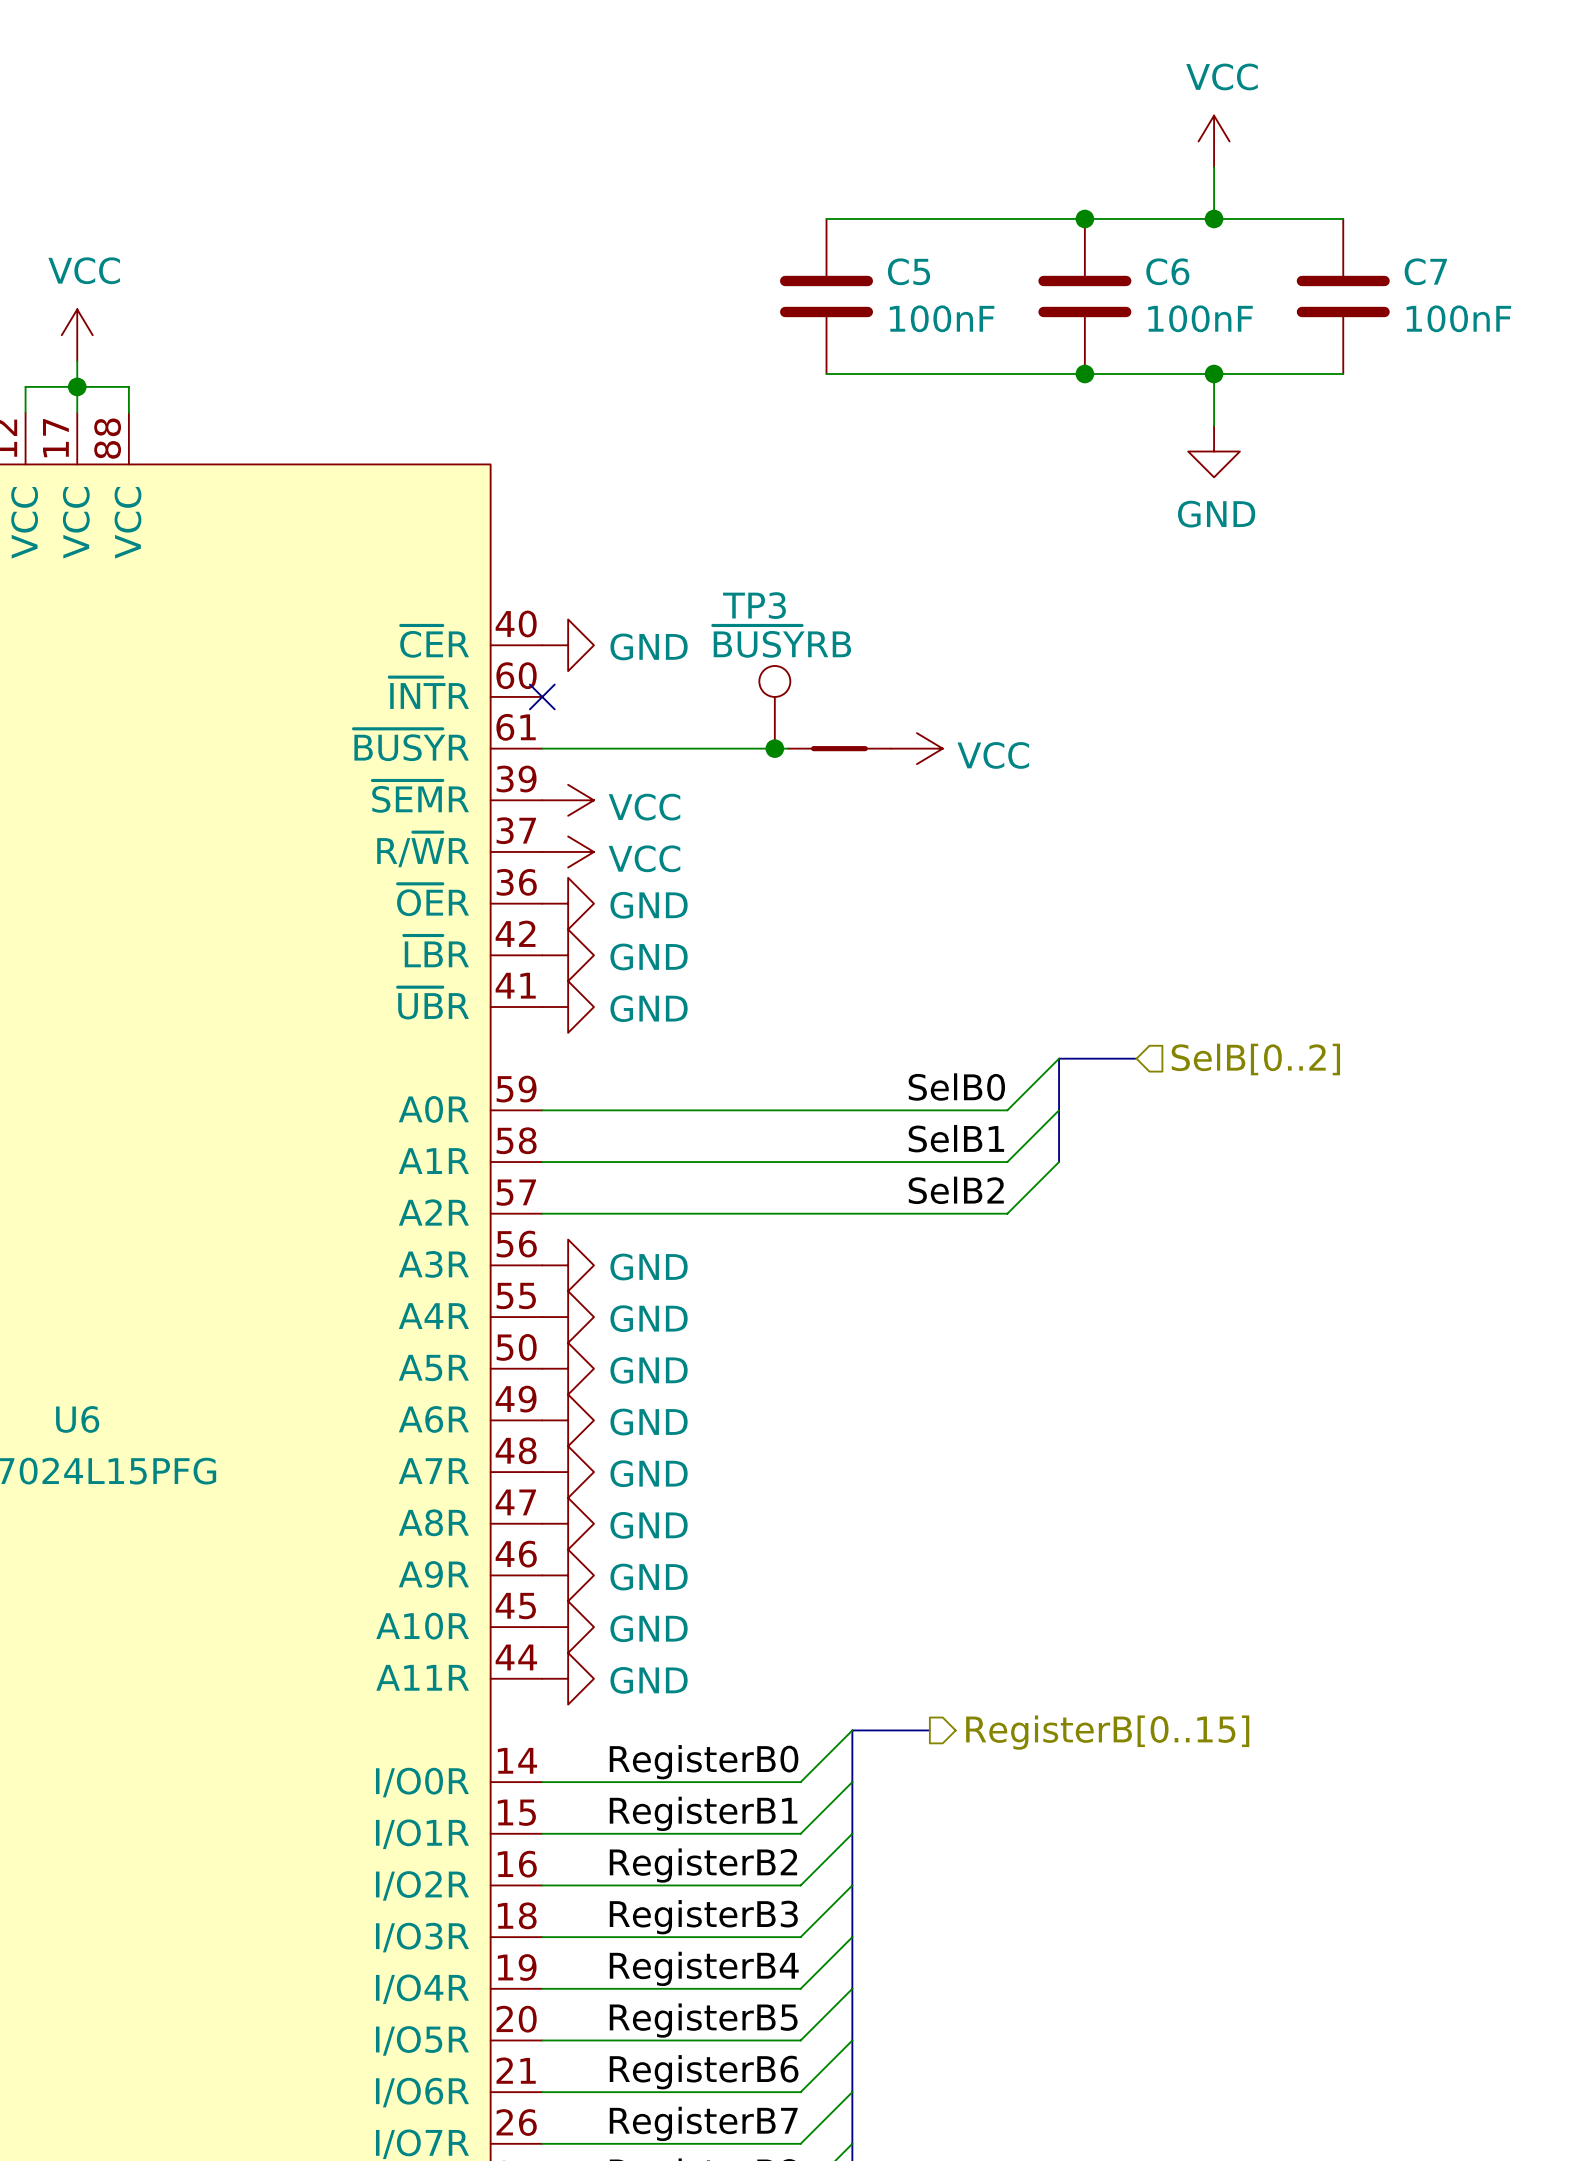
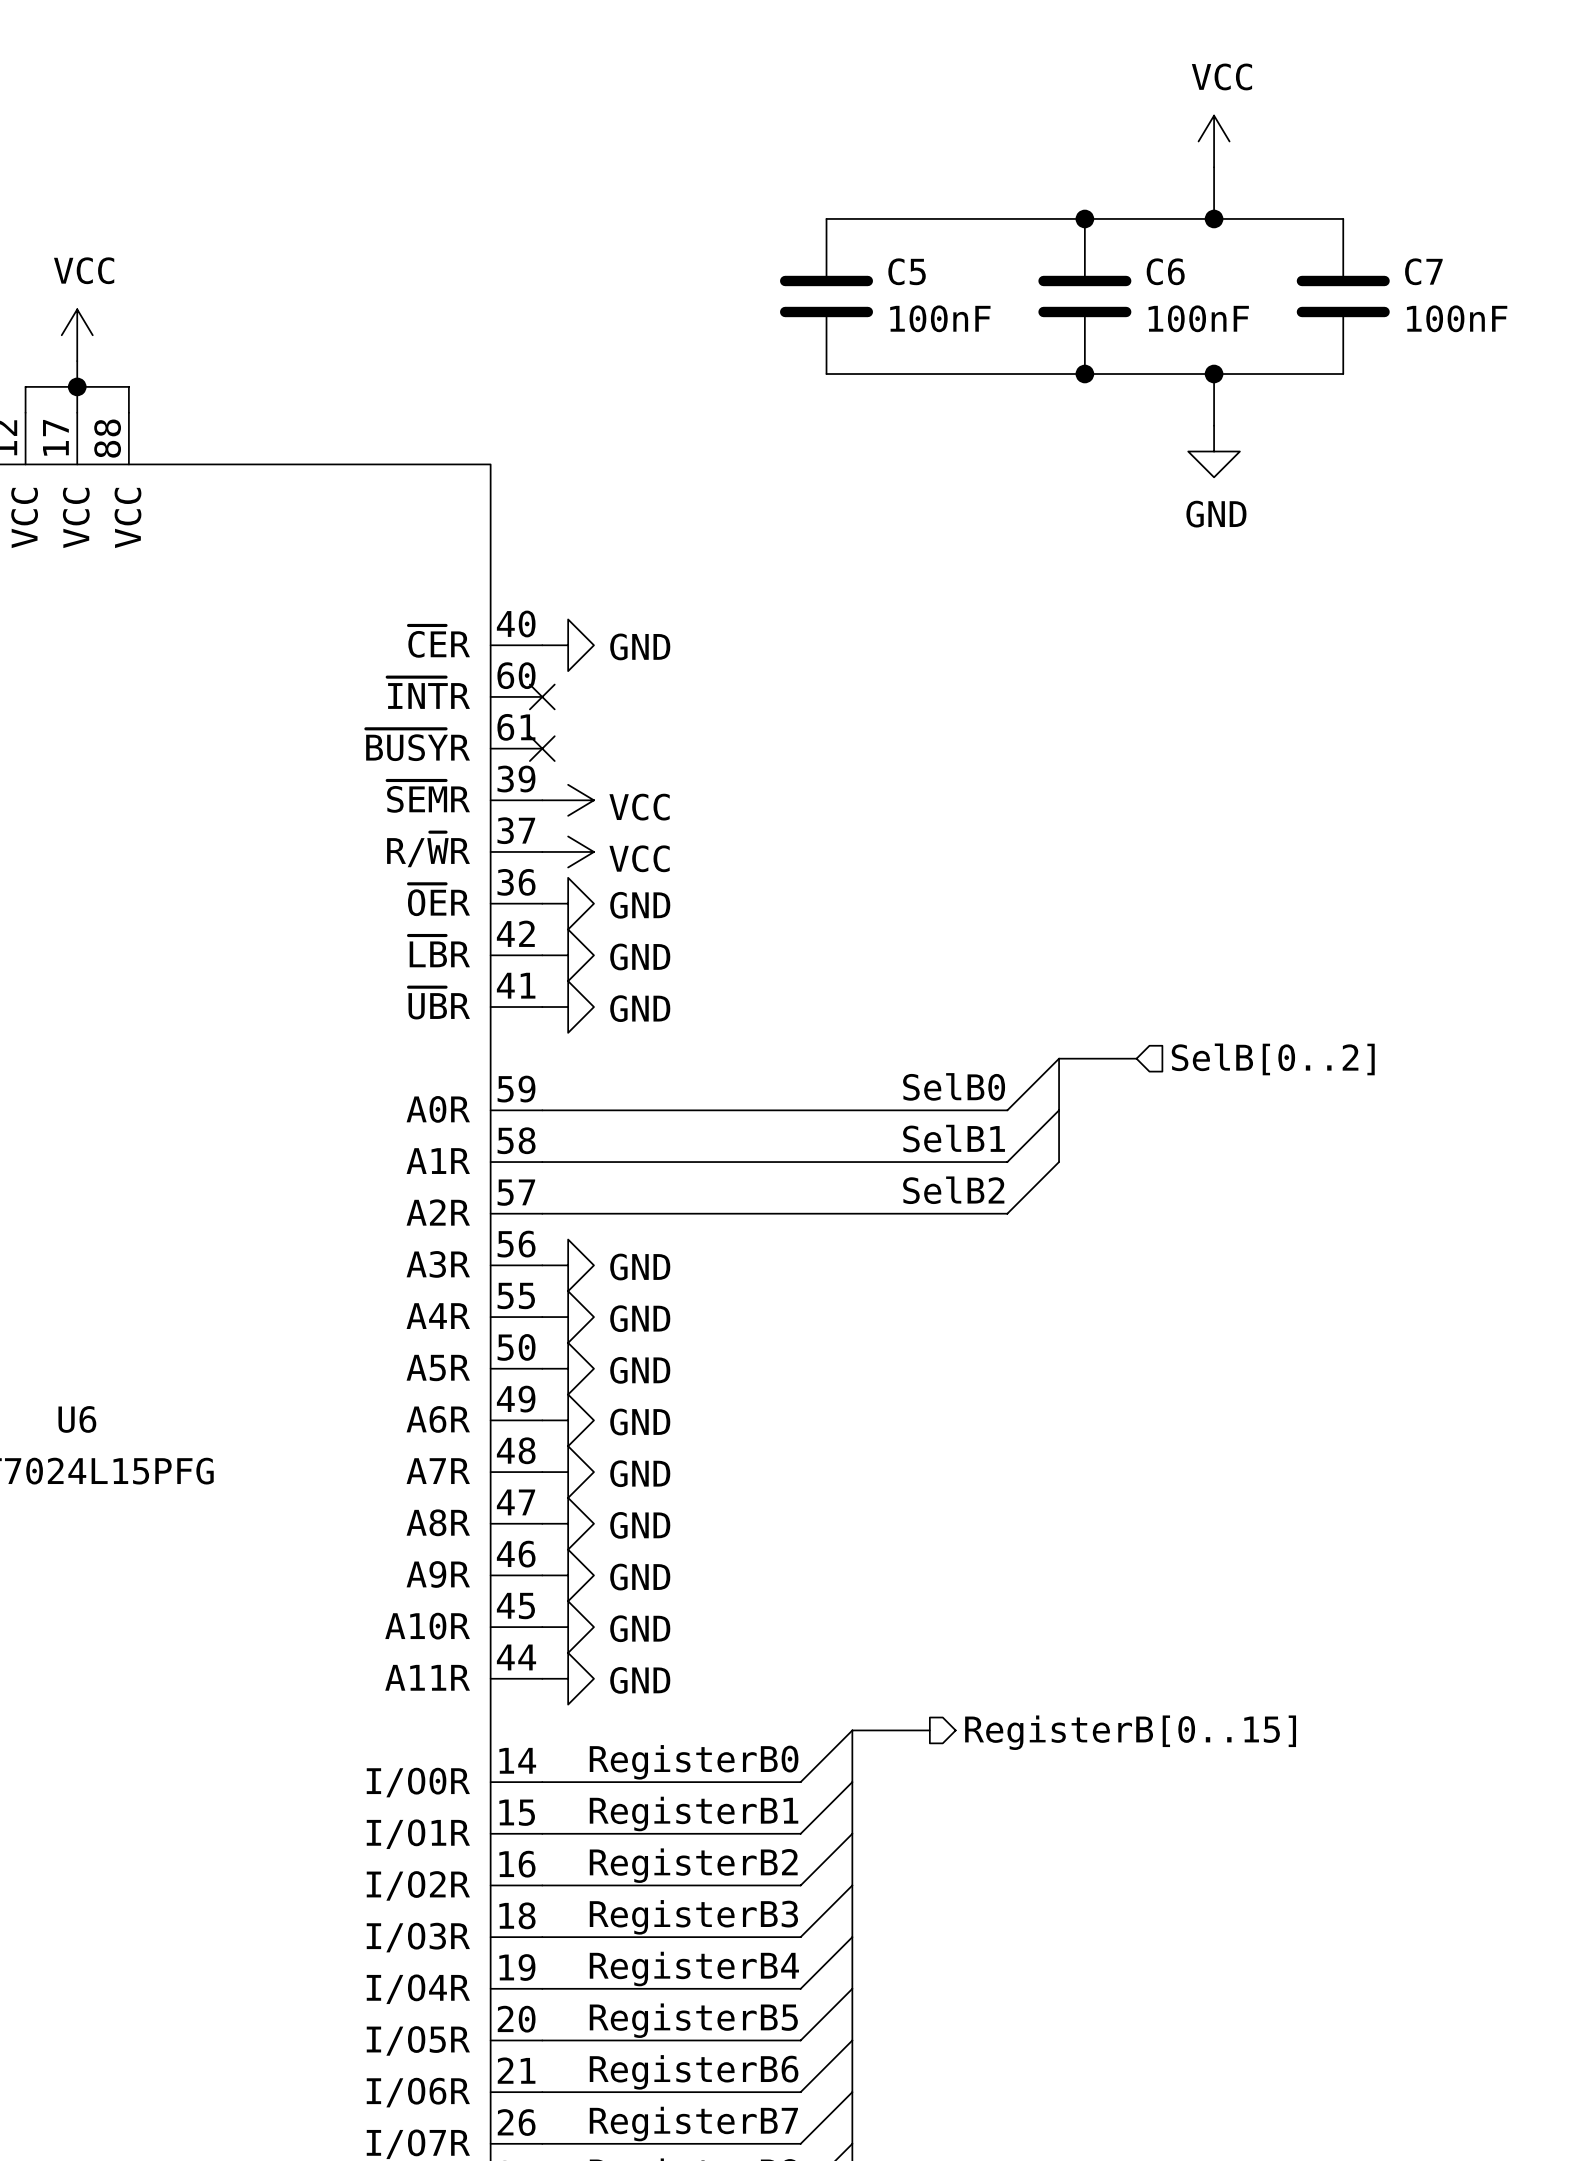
TP3: ~{BUSY}RB (774, 707) -> none
wire: (542, 748) (787, 748) -> none
no-connect mark: none -> (542, 748)
junction: (774, 748) -> none
part: (839, 748) -> none
power symbol: VCC (916, 748) -> none

